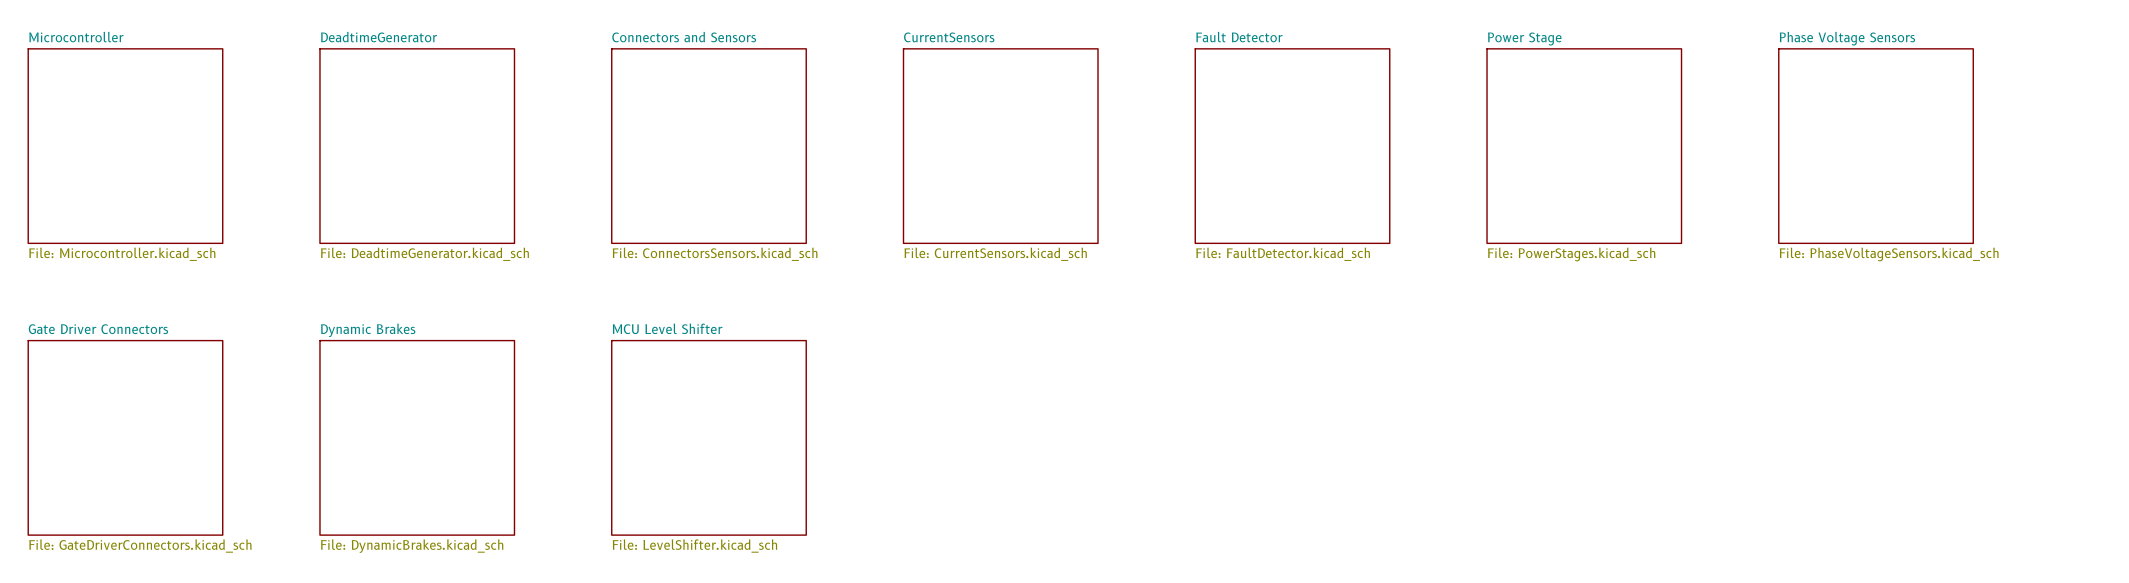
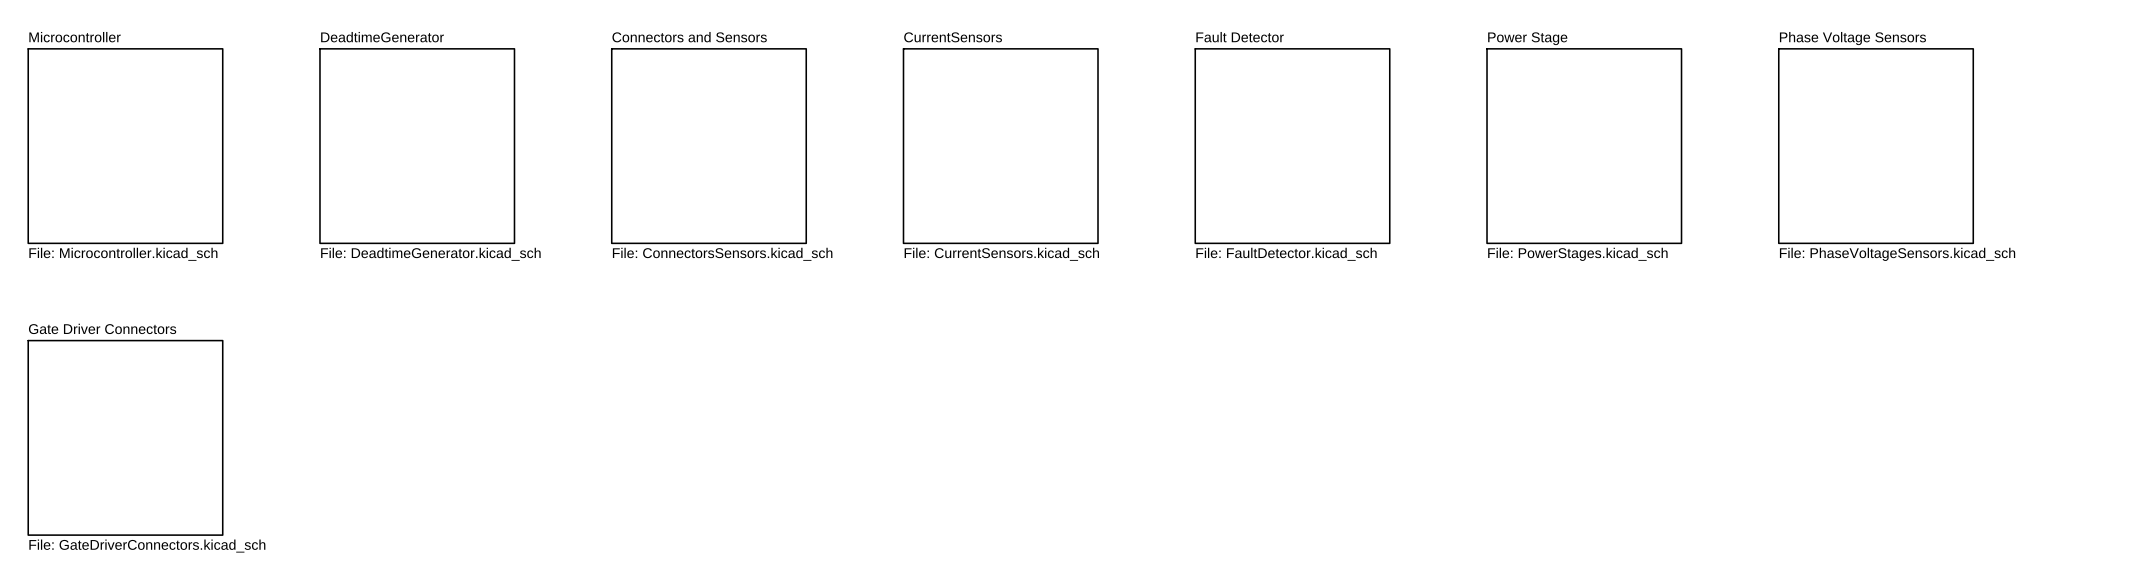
sheet Dynamic Brakes: File: DynamicBrakes.kicad_sch (417, 437) -> none
sheet MCU Level Shifter: File: LevelShifter.kicad_sch (708, 437) -> none

